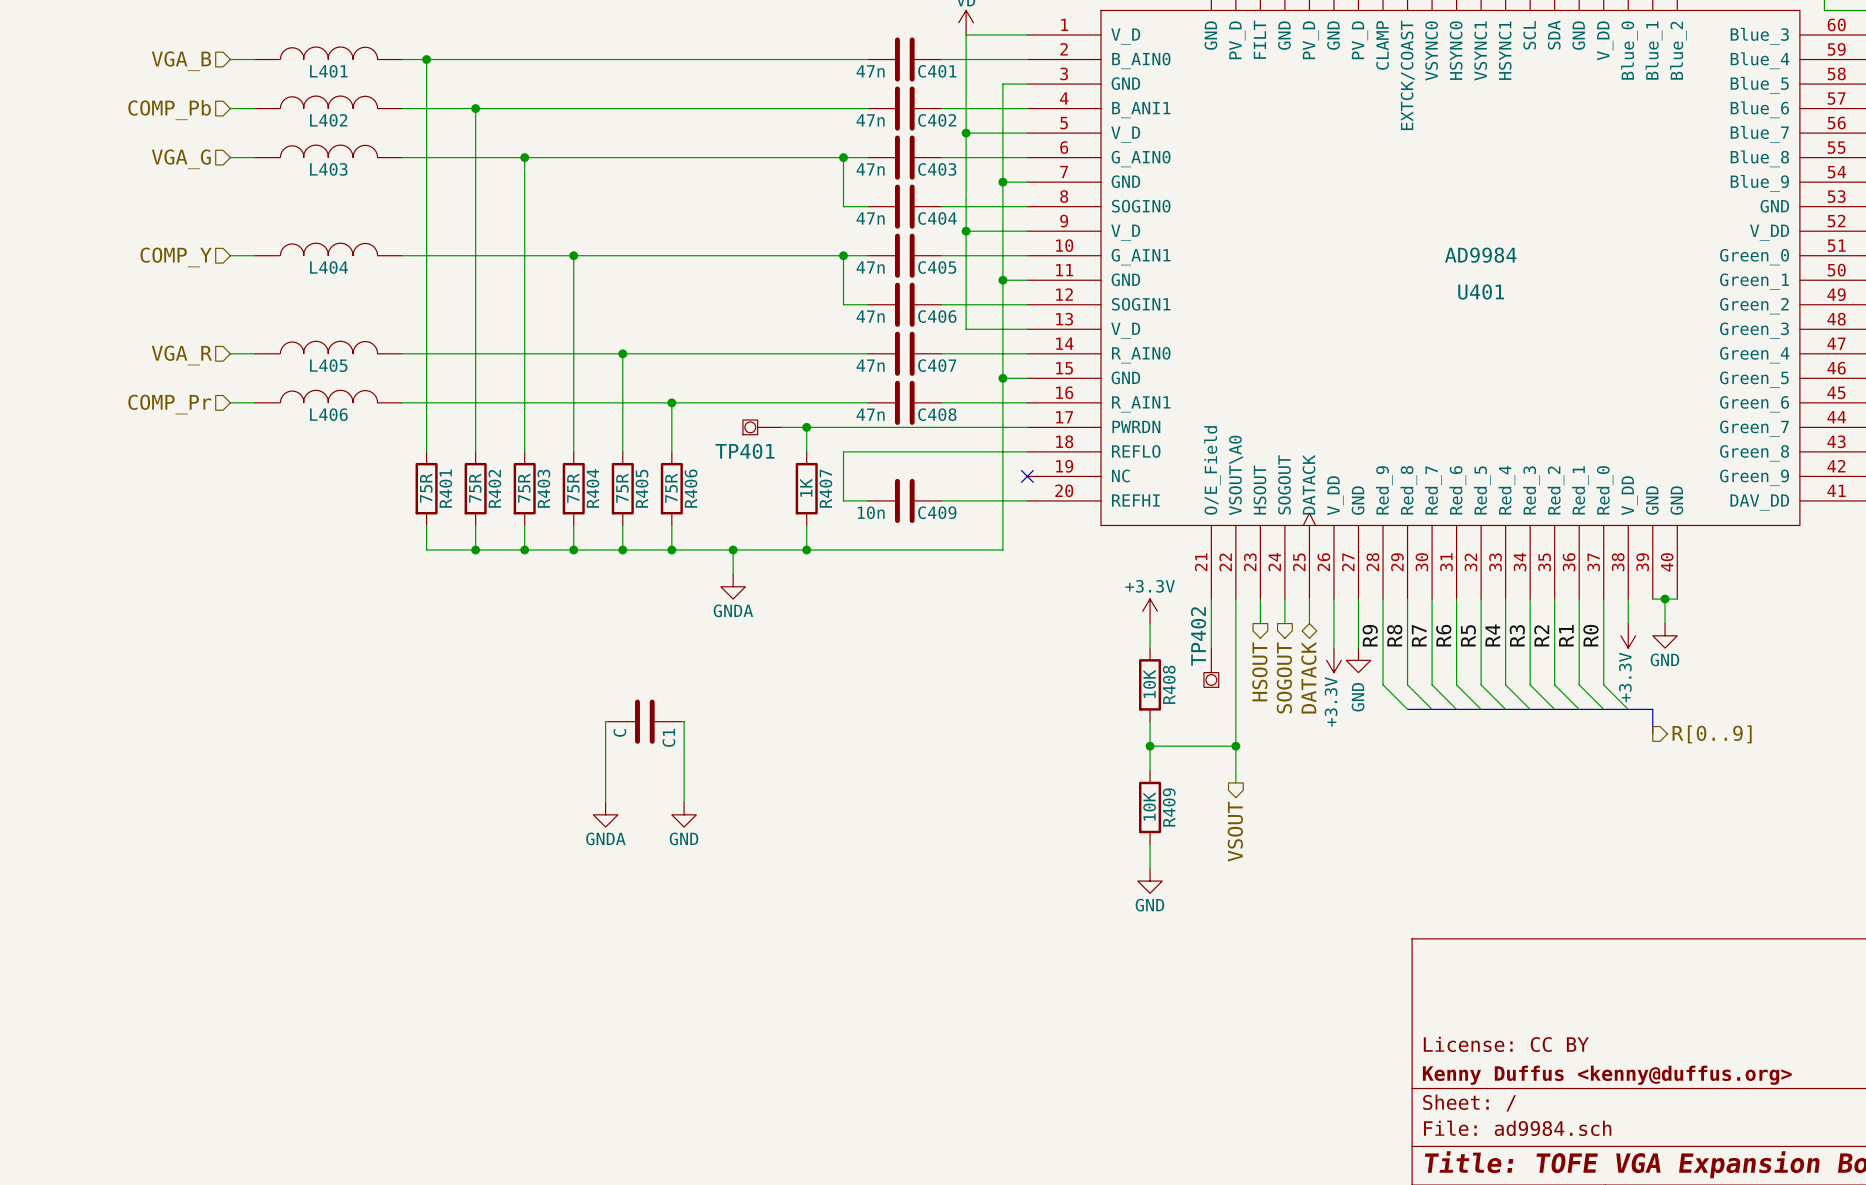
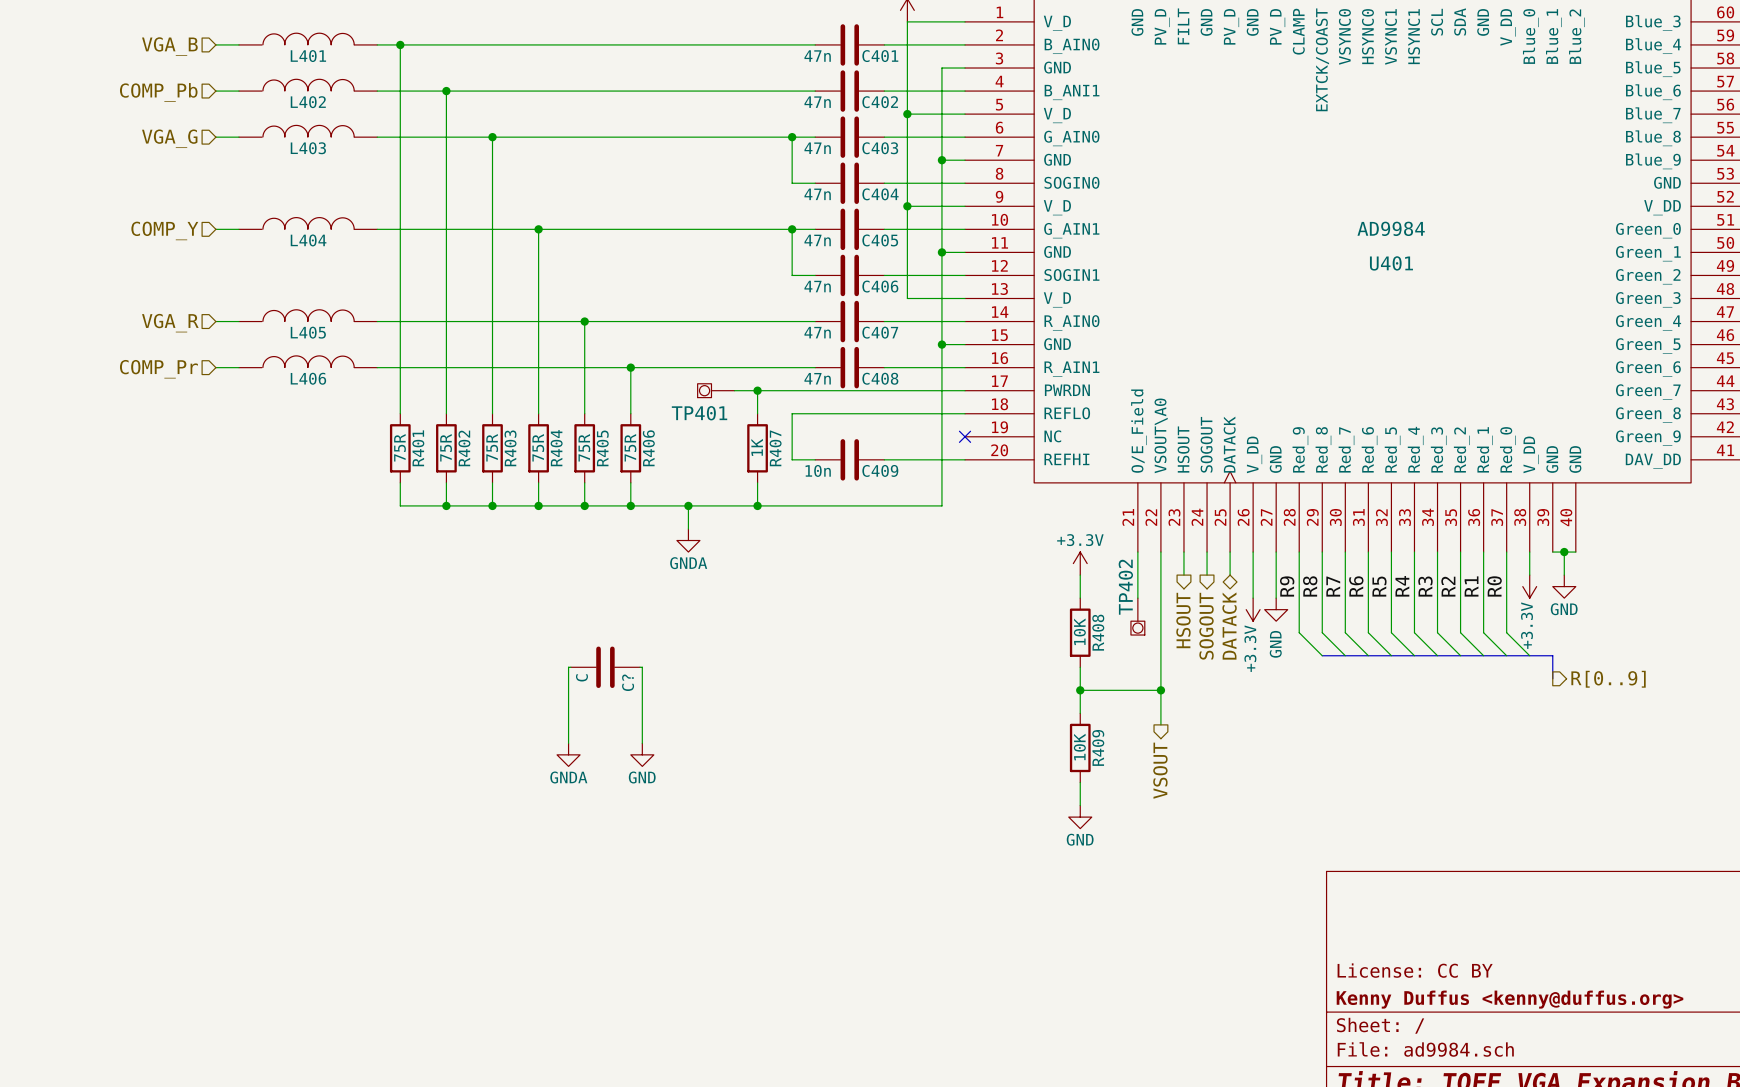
C1 name: C1 (668, 737) -> C? (628, 682)

